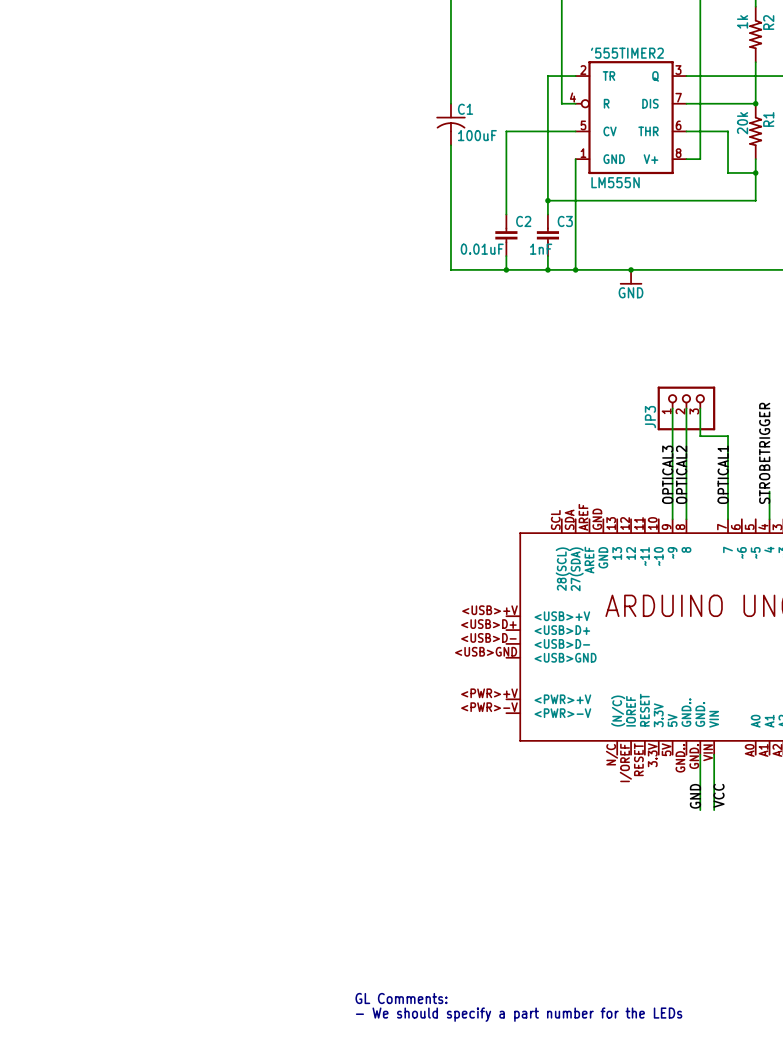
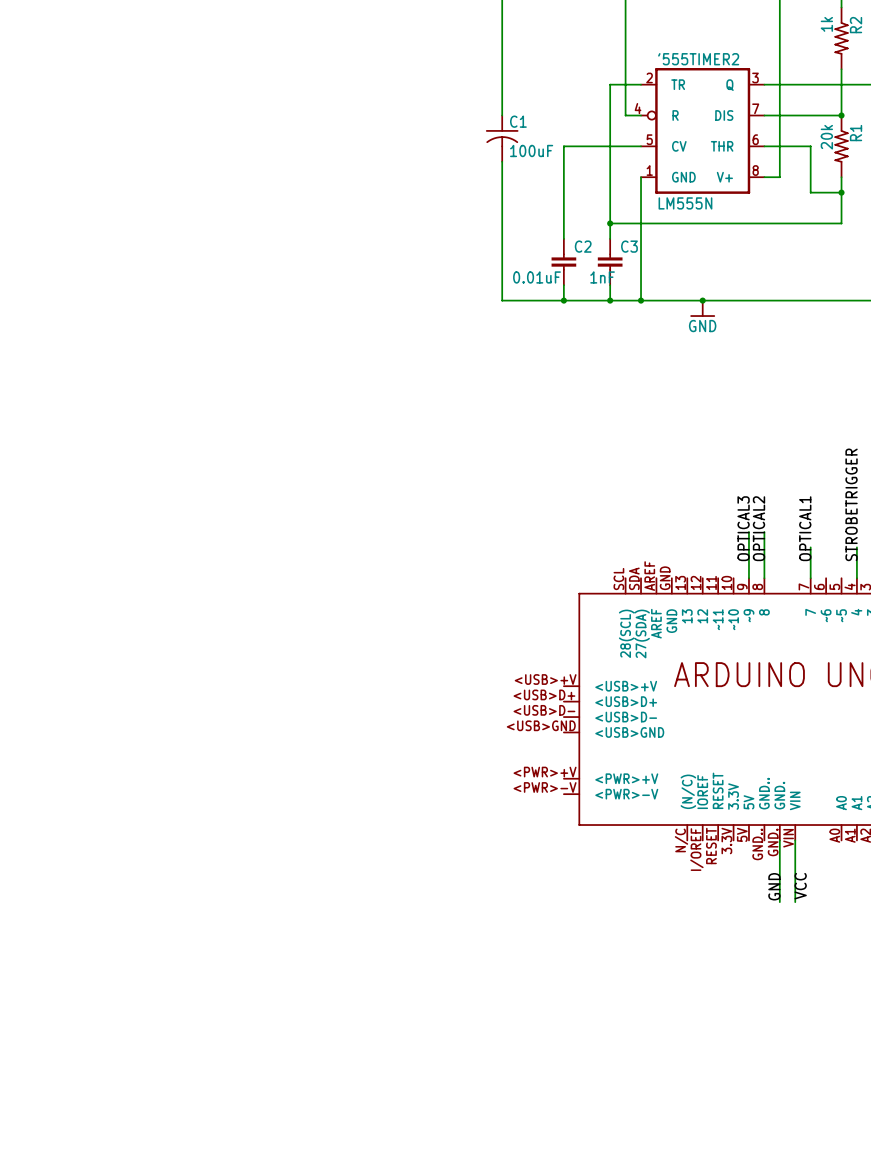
wire: (672, 408) (672, 477) -> none
wire: (686, 408) (686, 477) -> none
JP3: (686, 408) -> none
wire: (700, 408) (700, 436) (728, 436) (728, 491) -> none
text: GL Comments: (401, 998) -> none
text: - We should specify a part number for the LEDs (519, 1014) -> none

